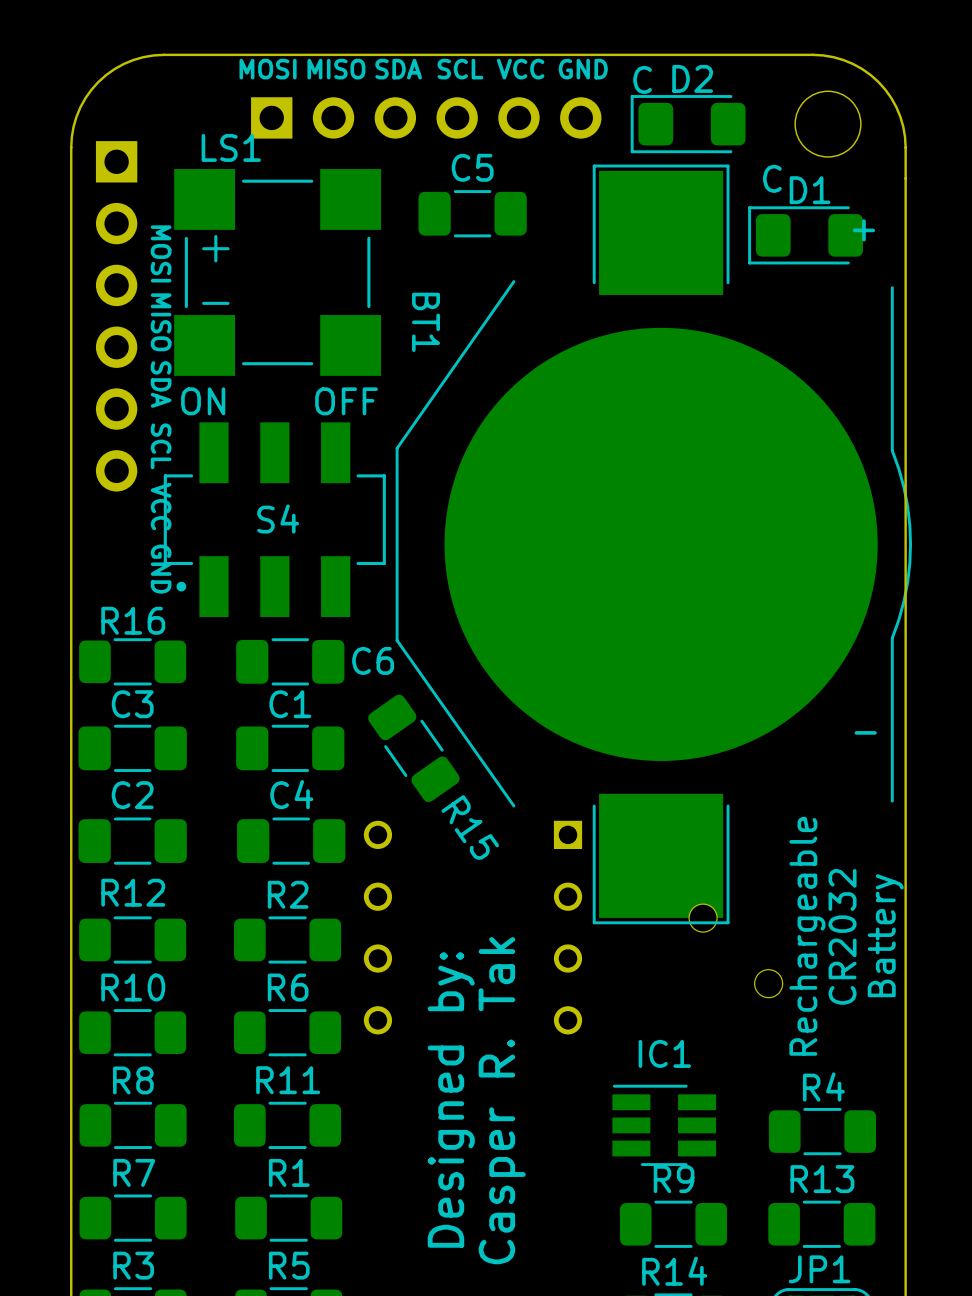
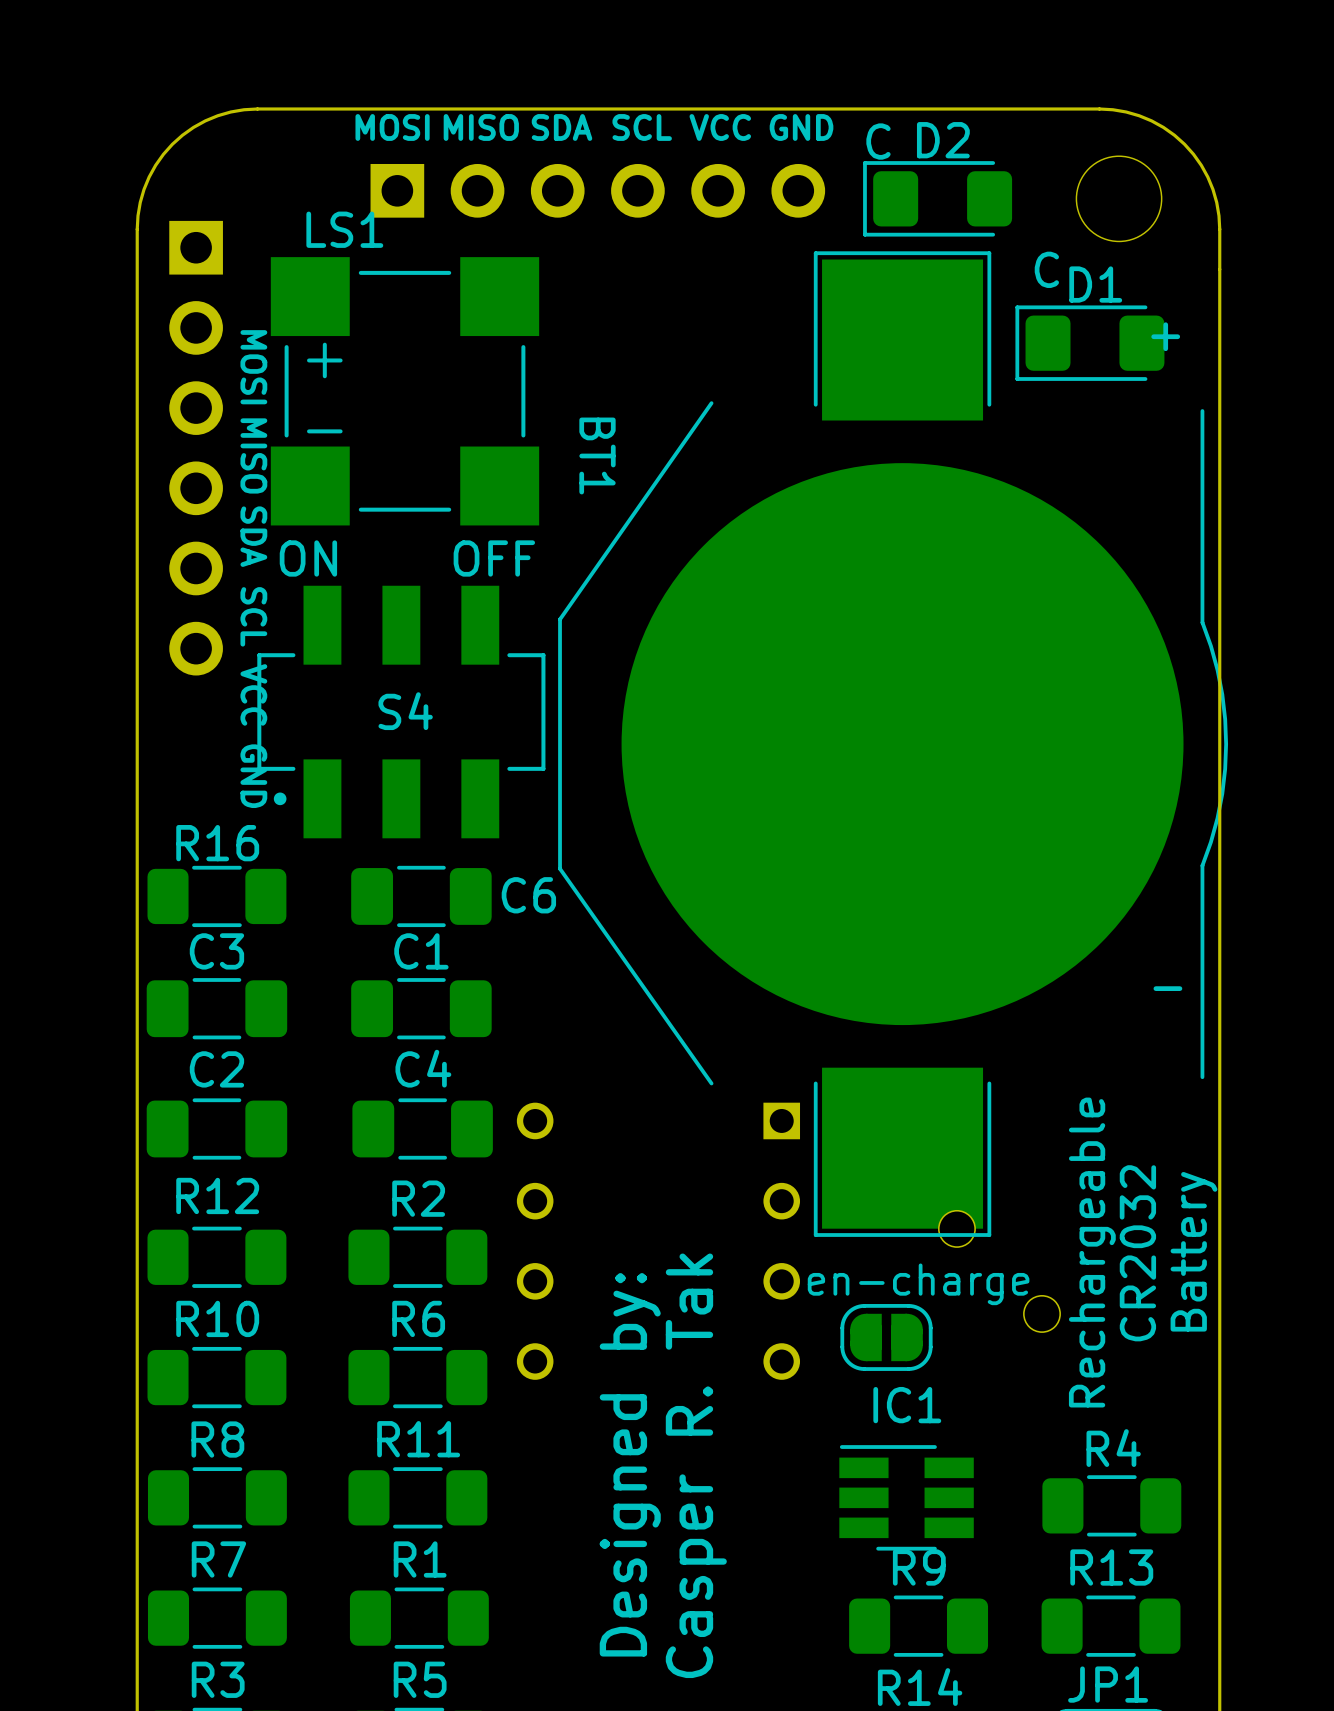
C5: (472, 213) -> none
R15: (413, 748) -> none
en-charge: none -> (886, 1337)

